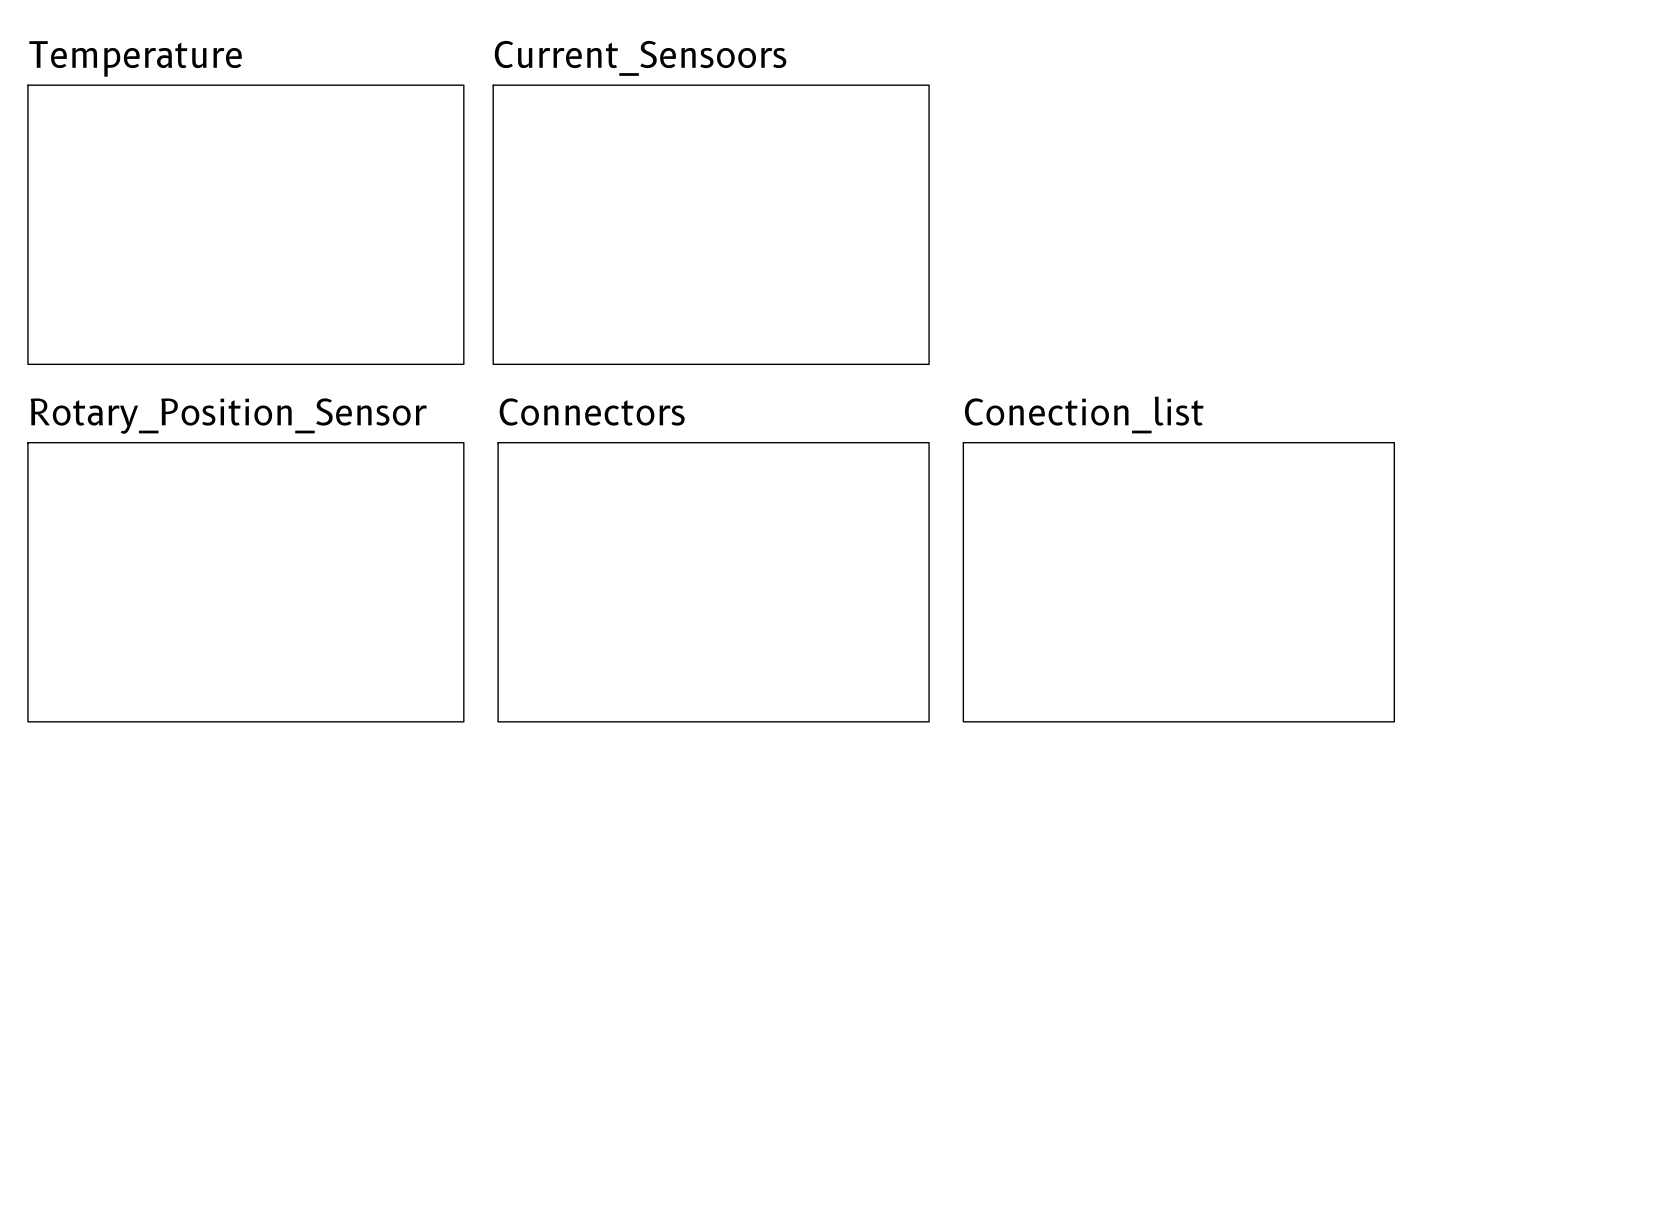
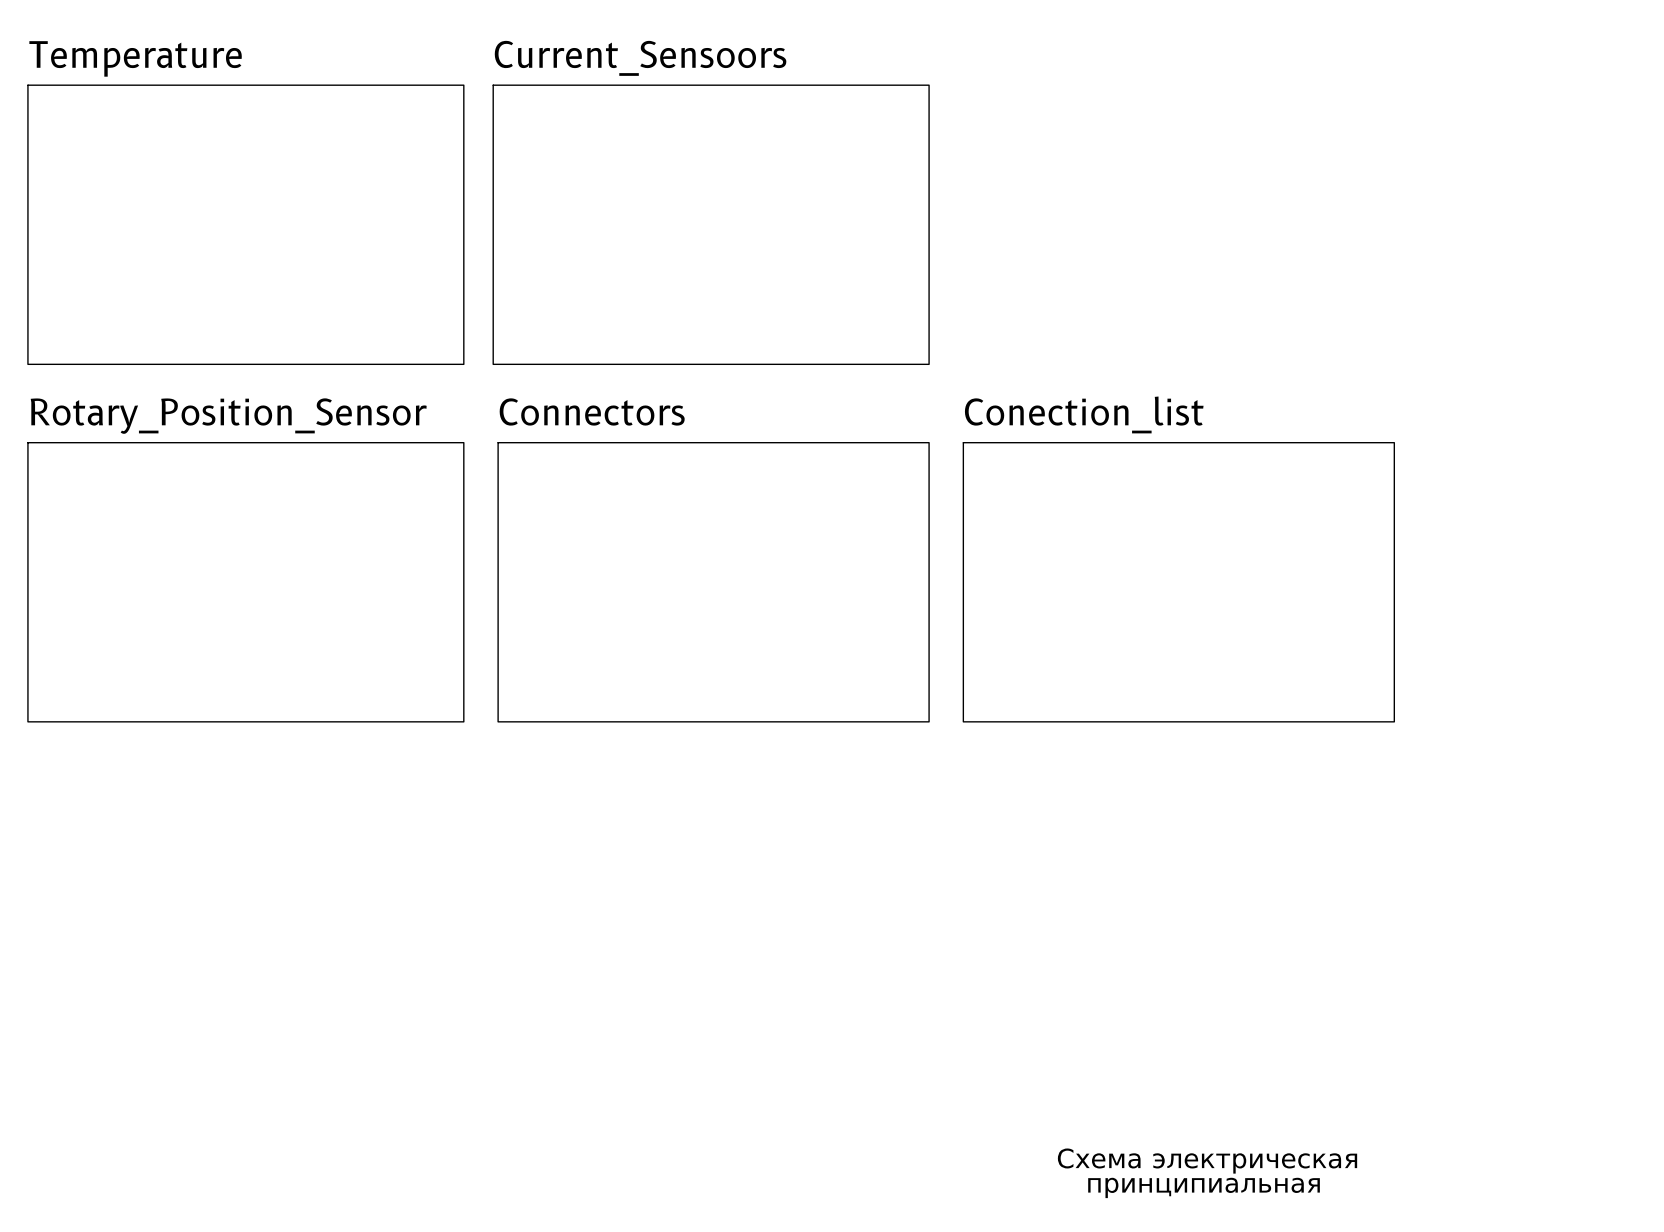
text: none -> Схема электрическая (1207, 1161)
text: none -> принципиальная (1204, 1187)

